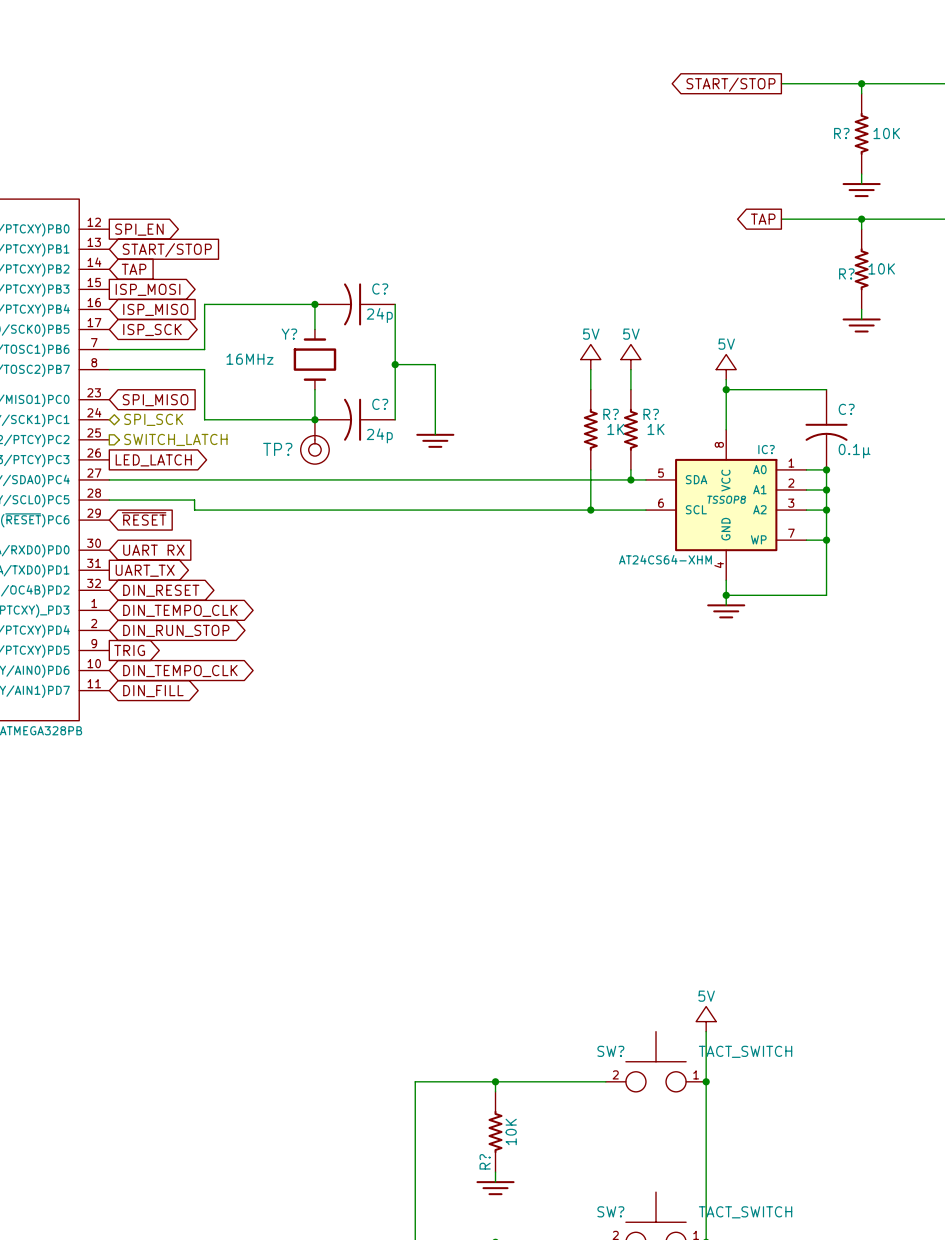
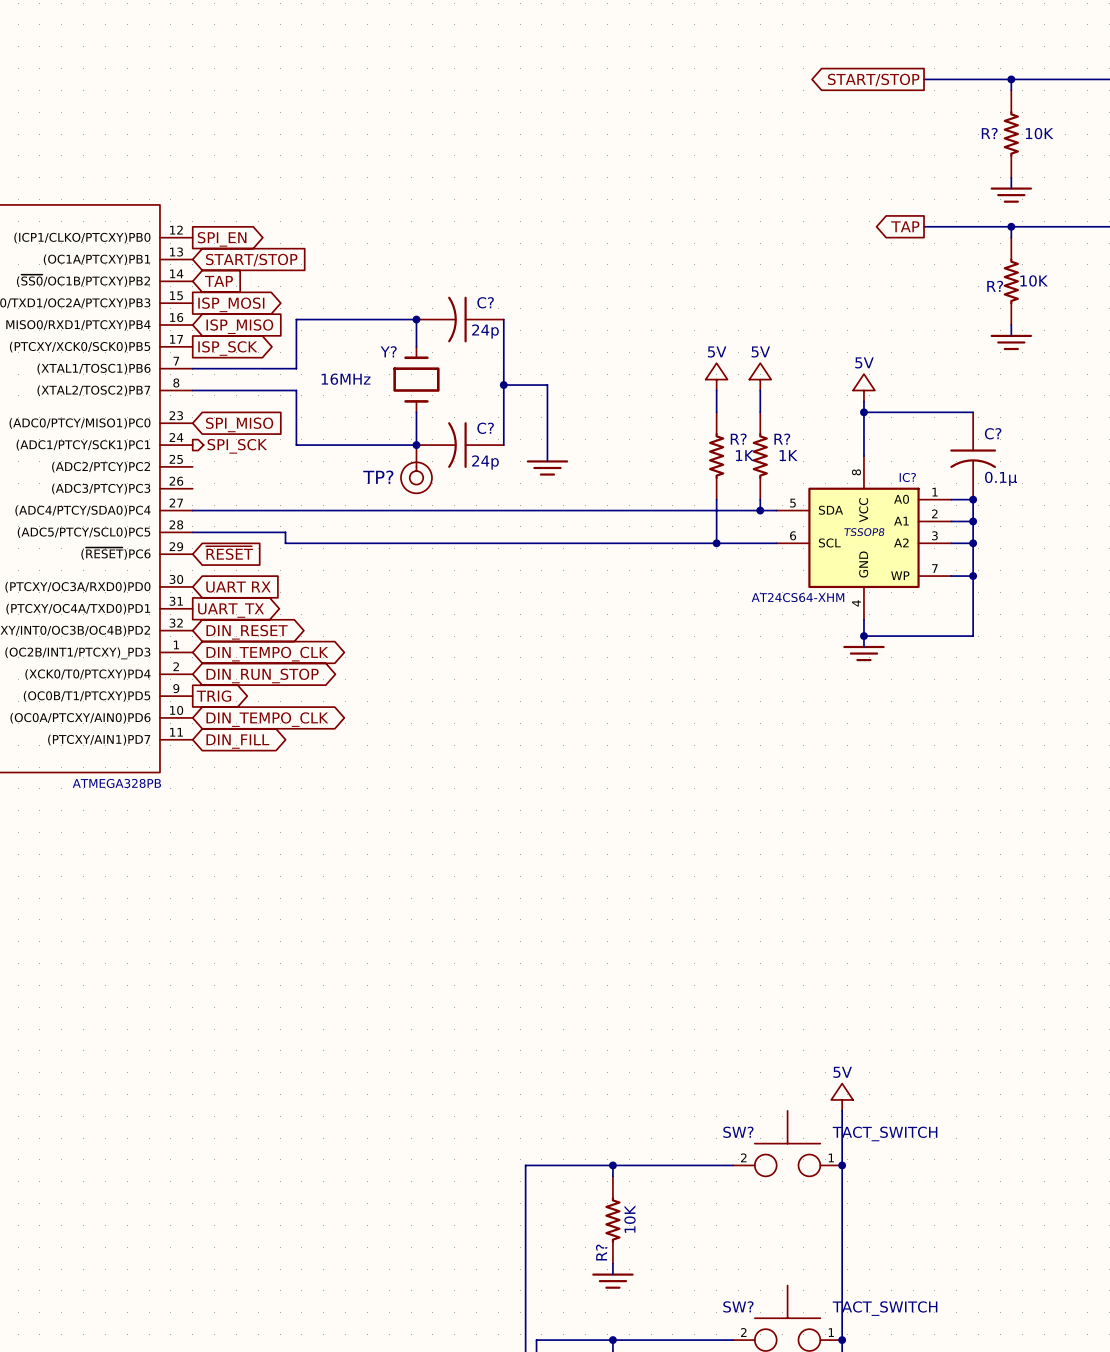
global label shape: bidirectional (152, 329) -> output (227, 348)
hierarchical label shape: bidirectional (153, 419) -> output (237, 446)
hierarchical label: SWITCH_LATCH (175, 439) -> none
global label: LED_LATCH (153, 460) -> none

